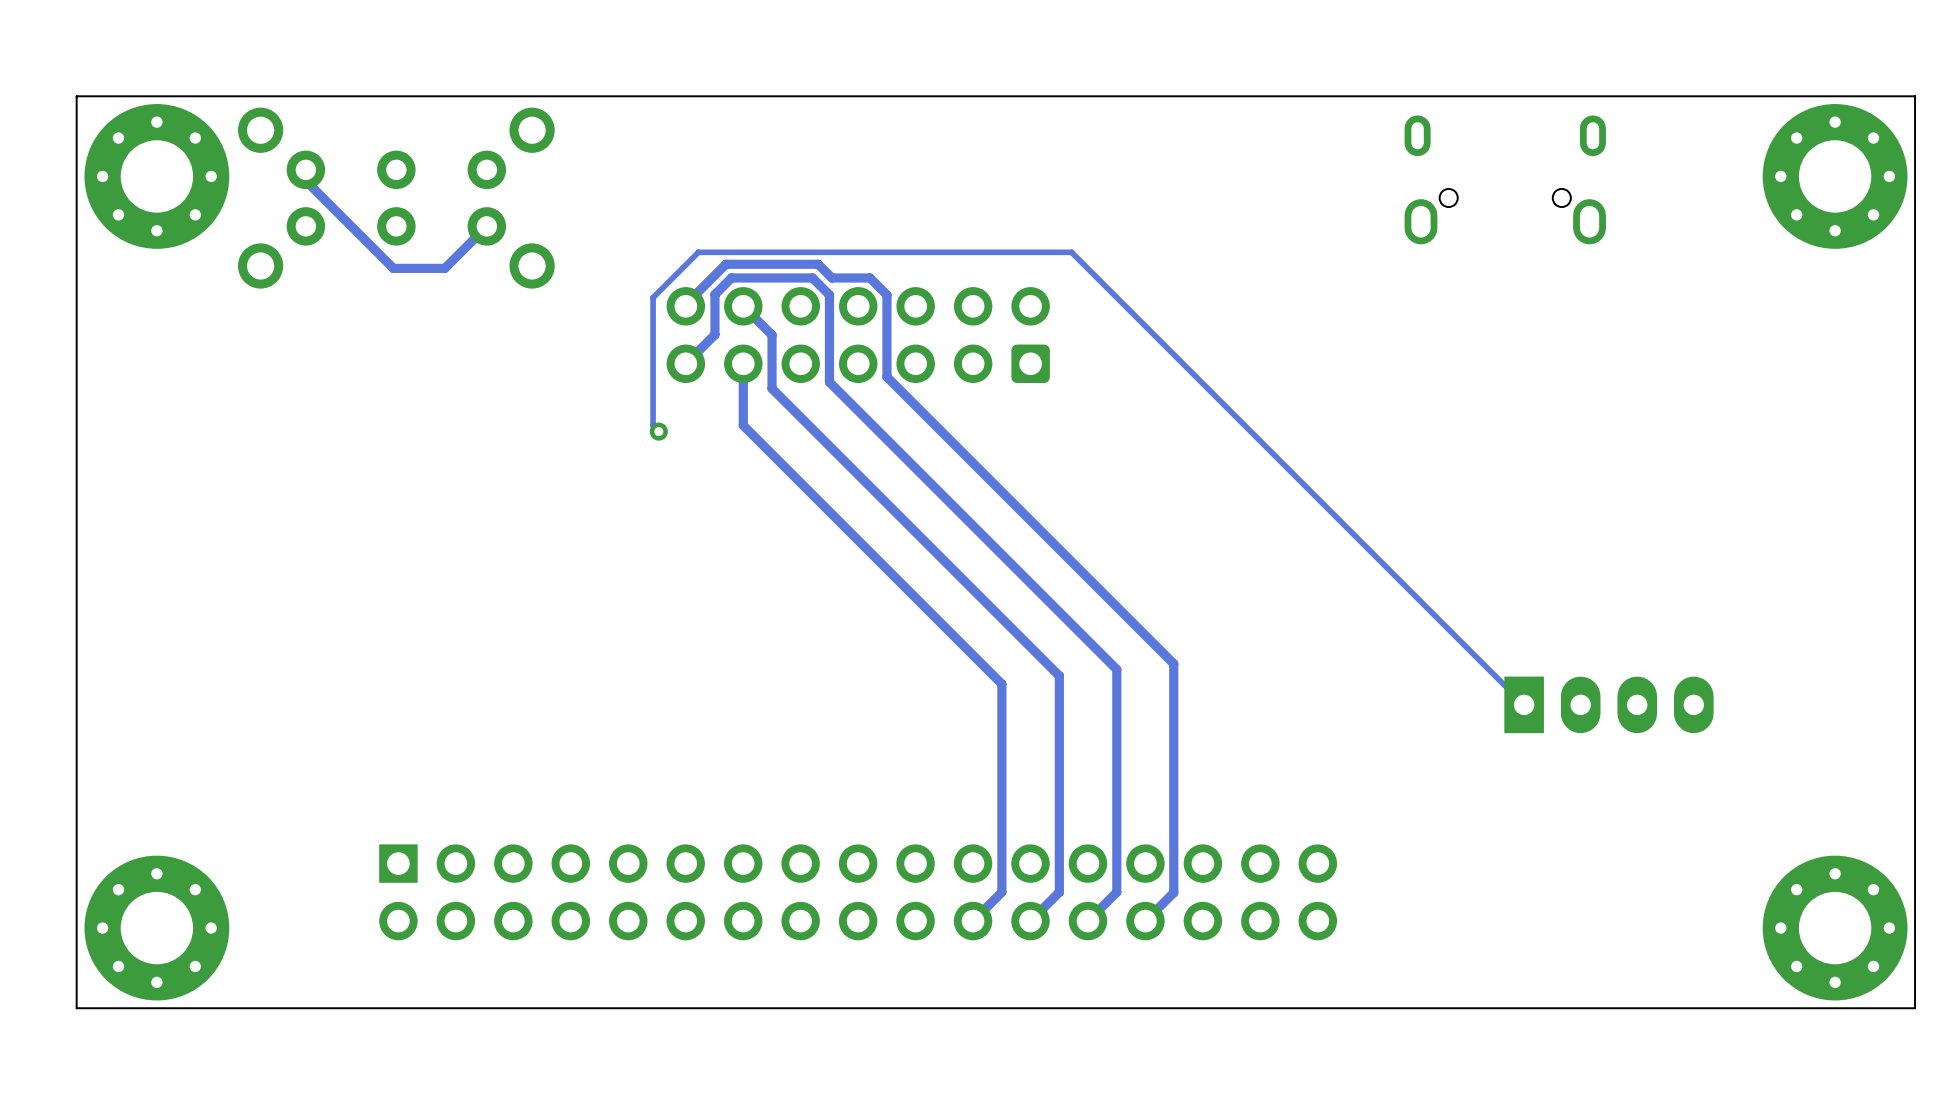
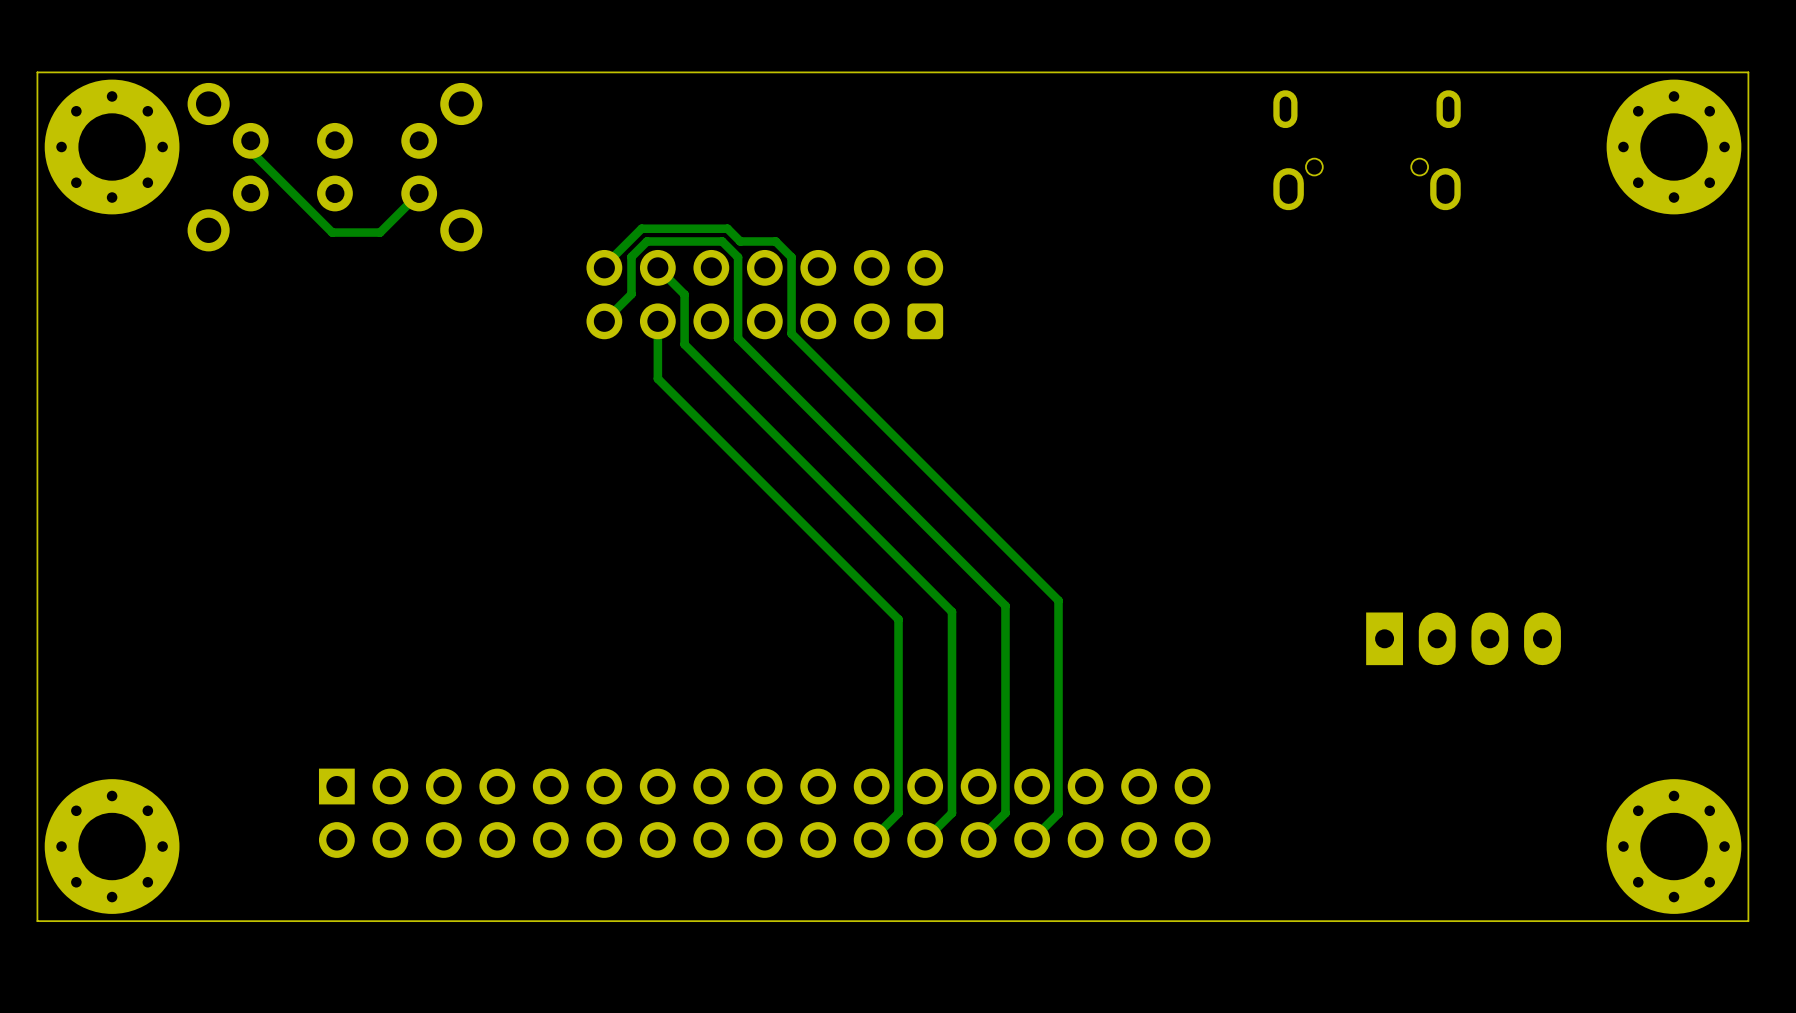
track: (658, 431) (653, 425) (653, 297) (698, 252) (1071, 252) (1524, 704) -> none
via: (658, 431) -> none

